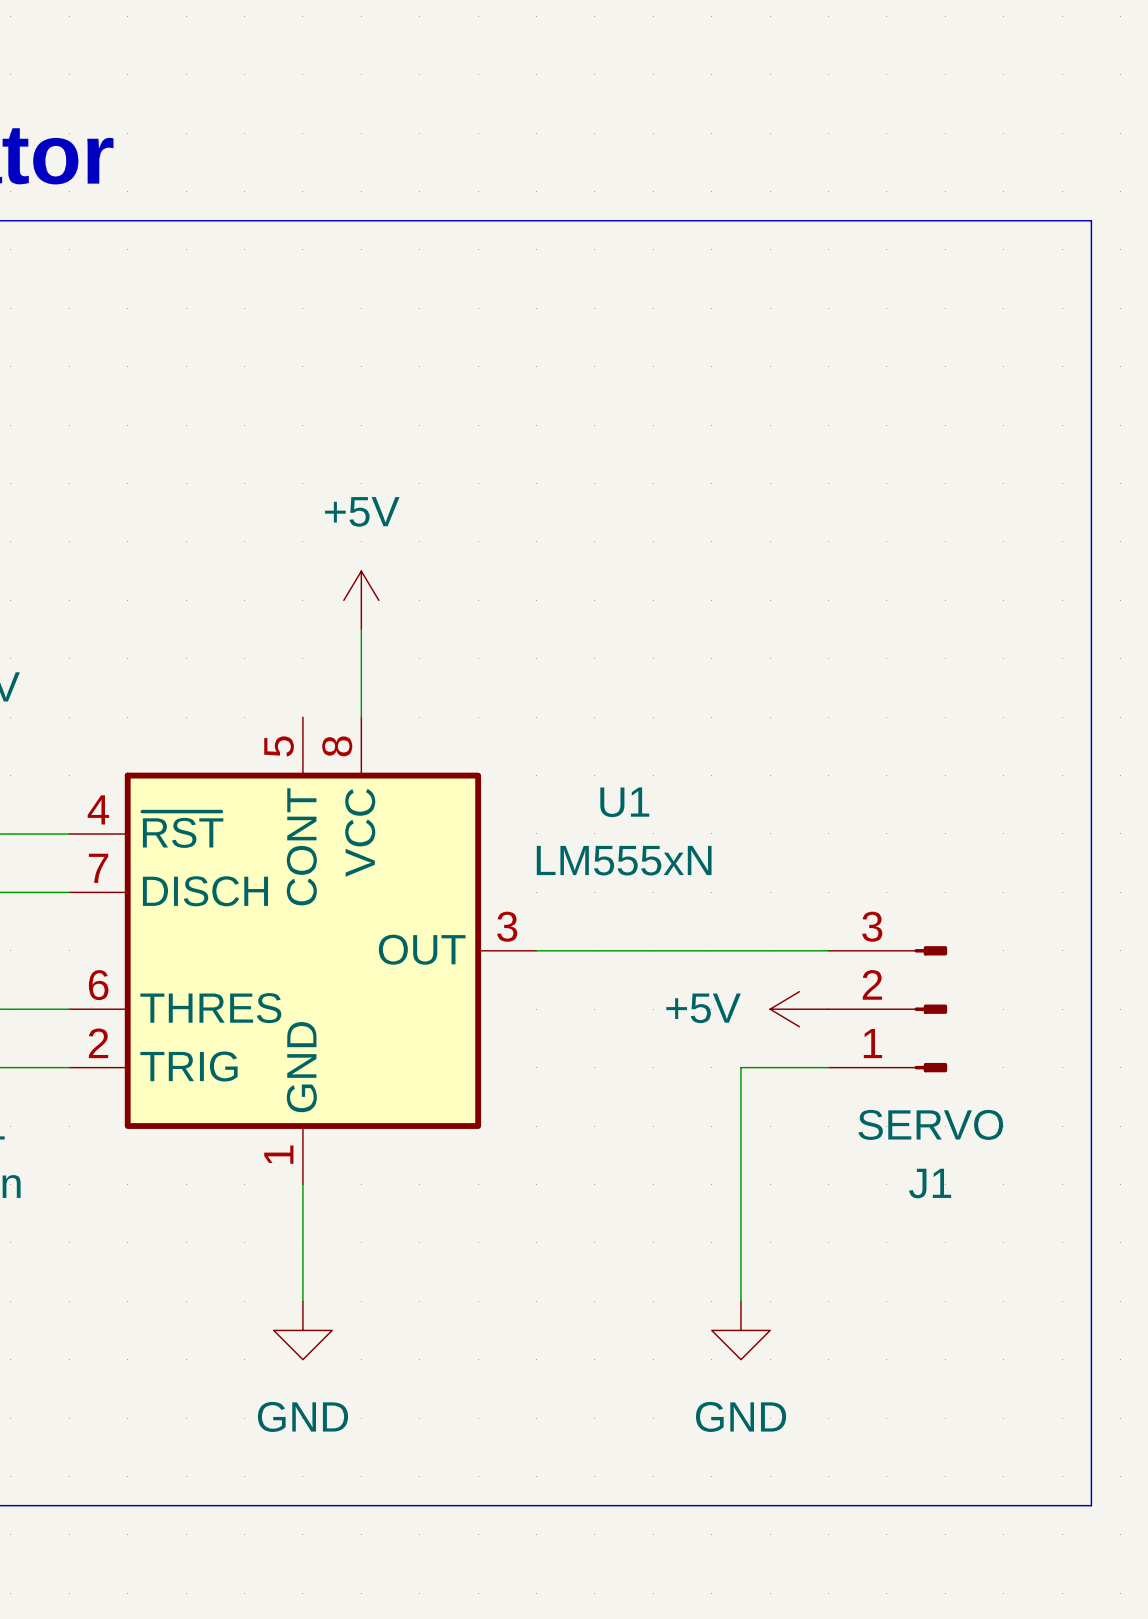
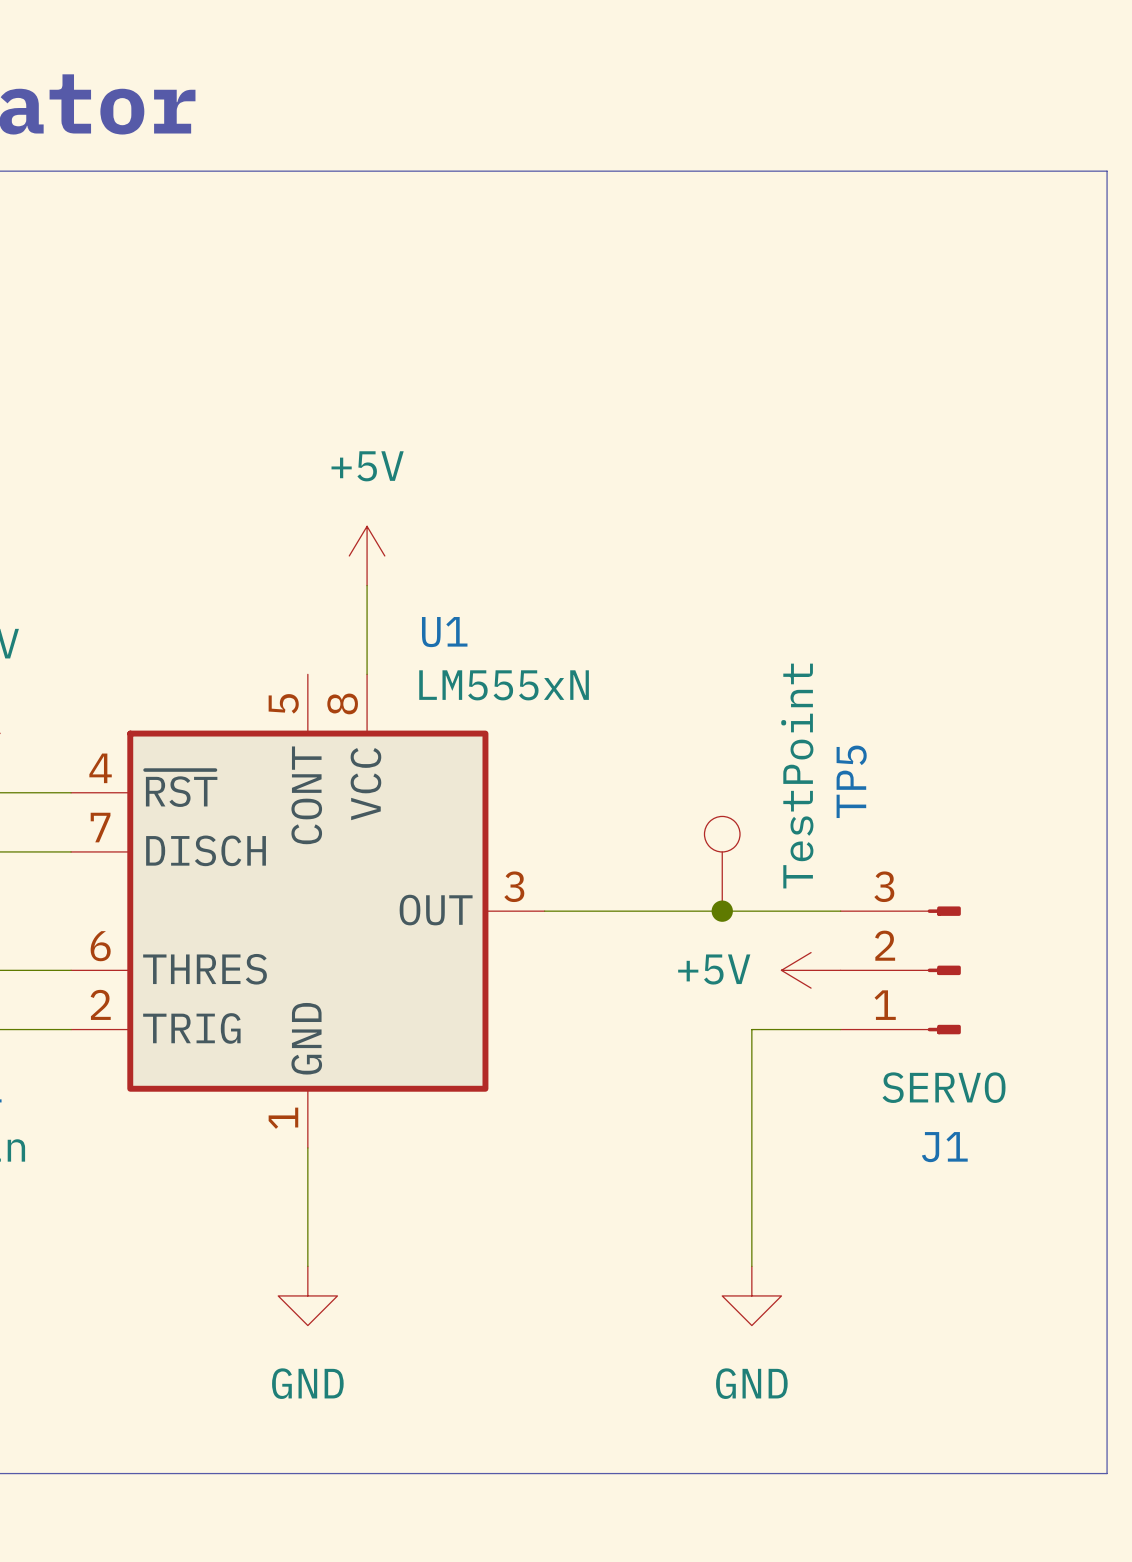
U1 name position: U1 (624, 802) -> U1 (444, 632)
U1 value position: LM555xN (624, 860) -> LM555xN (504, 685)
TP5: none -> TestPoint (722, 863)
junction: none -> (722, 911)

